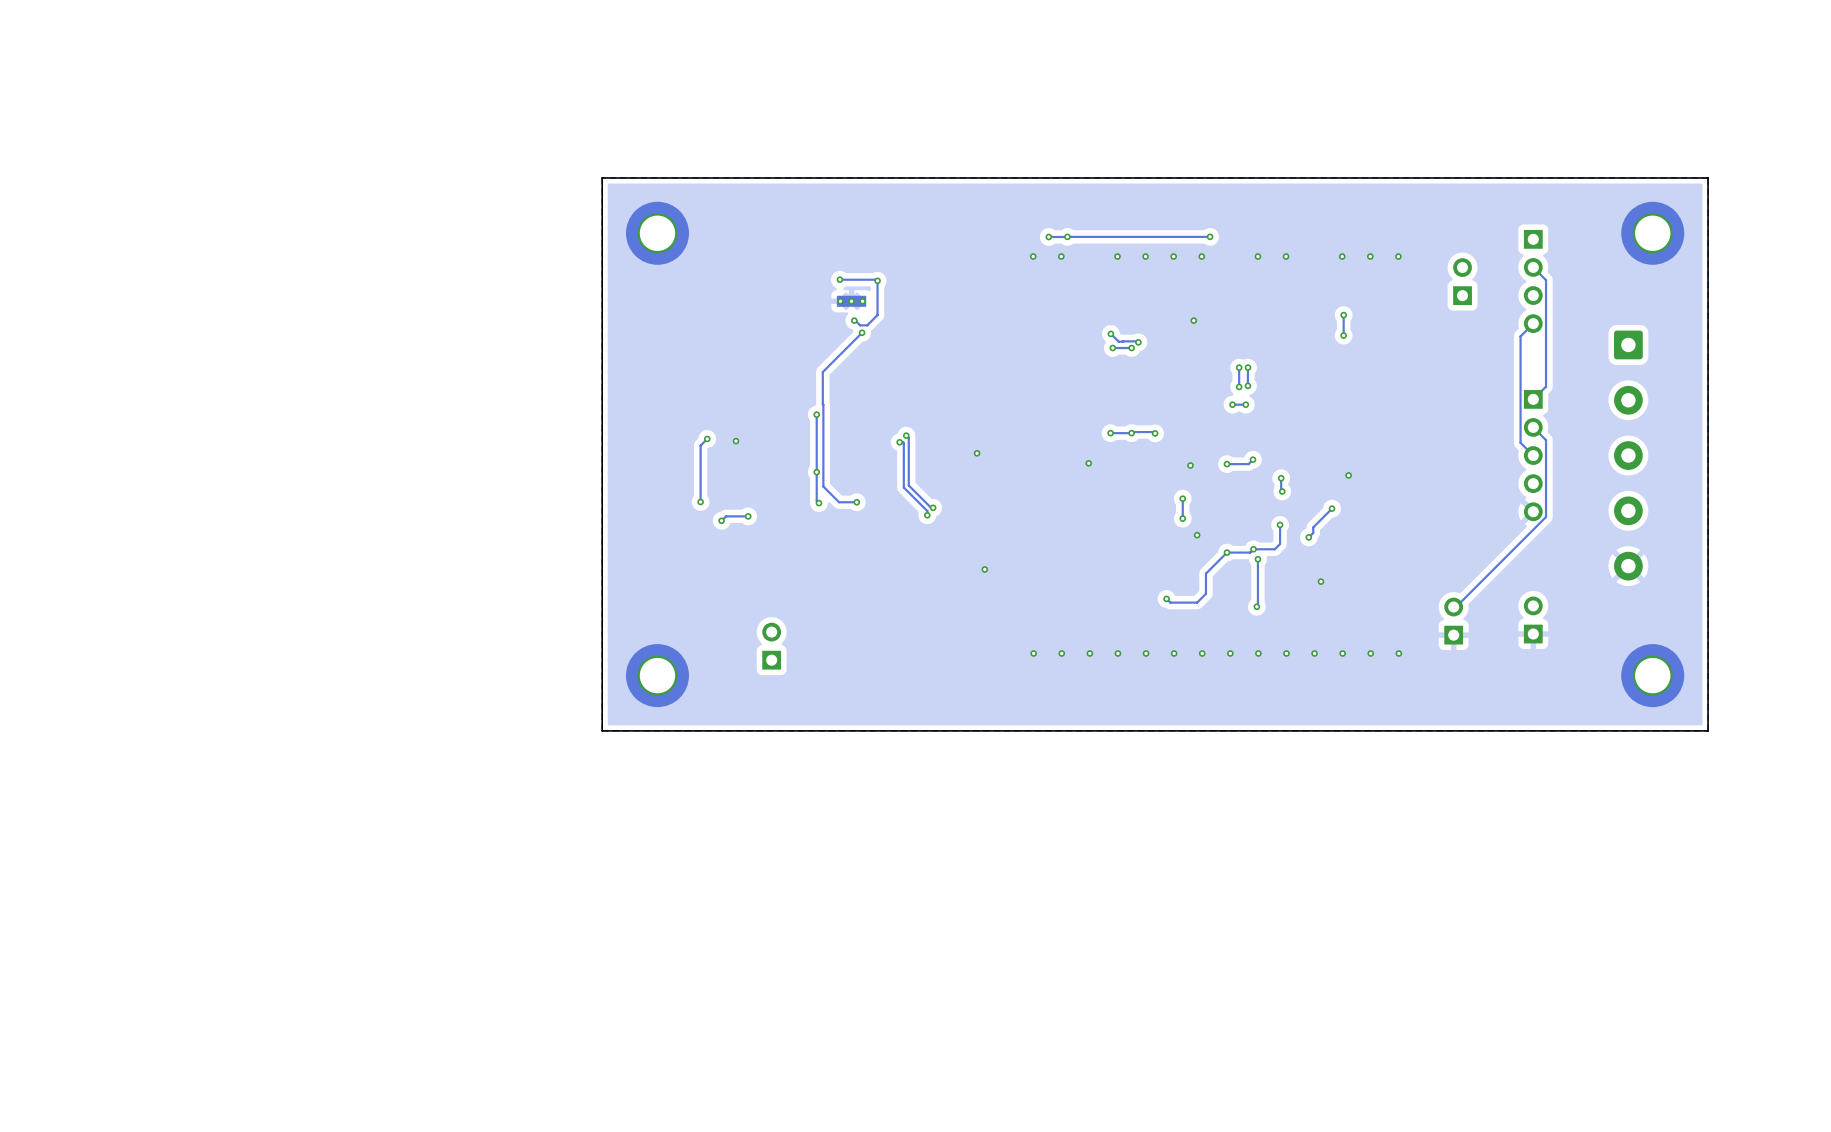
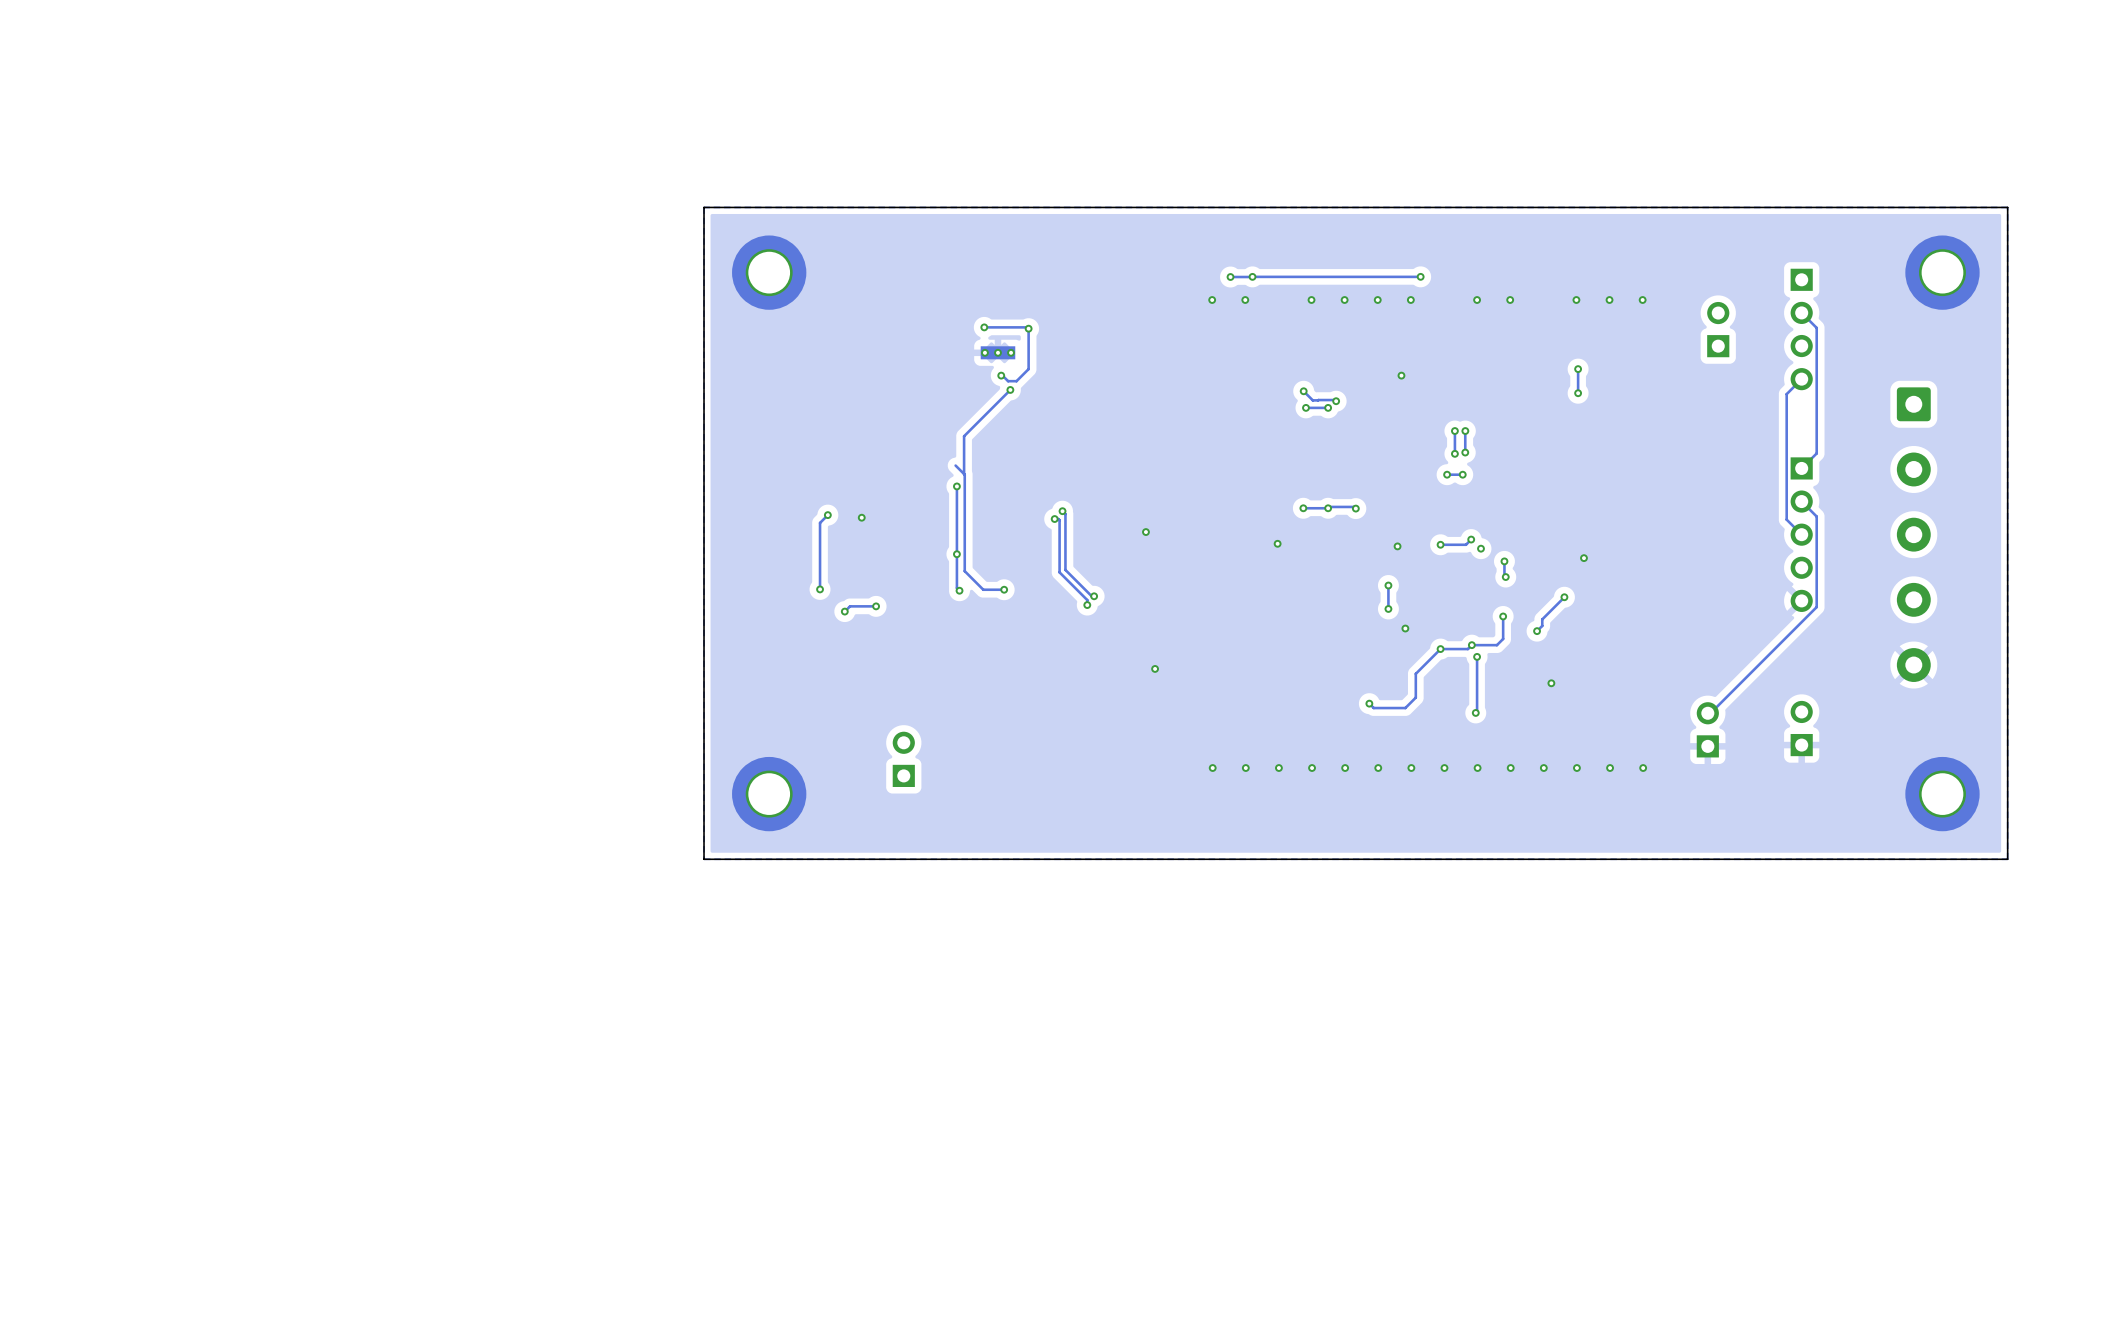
track: none -> (955, 465) (964, 474)
via: none -> (1480, 548)

